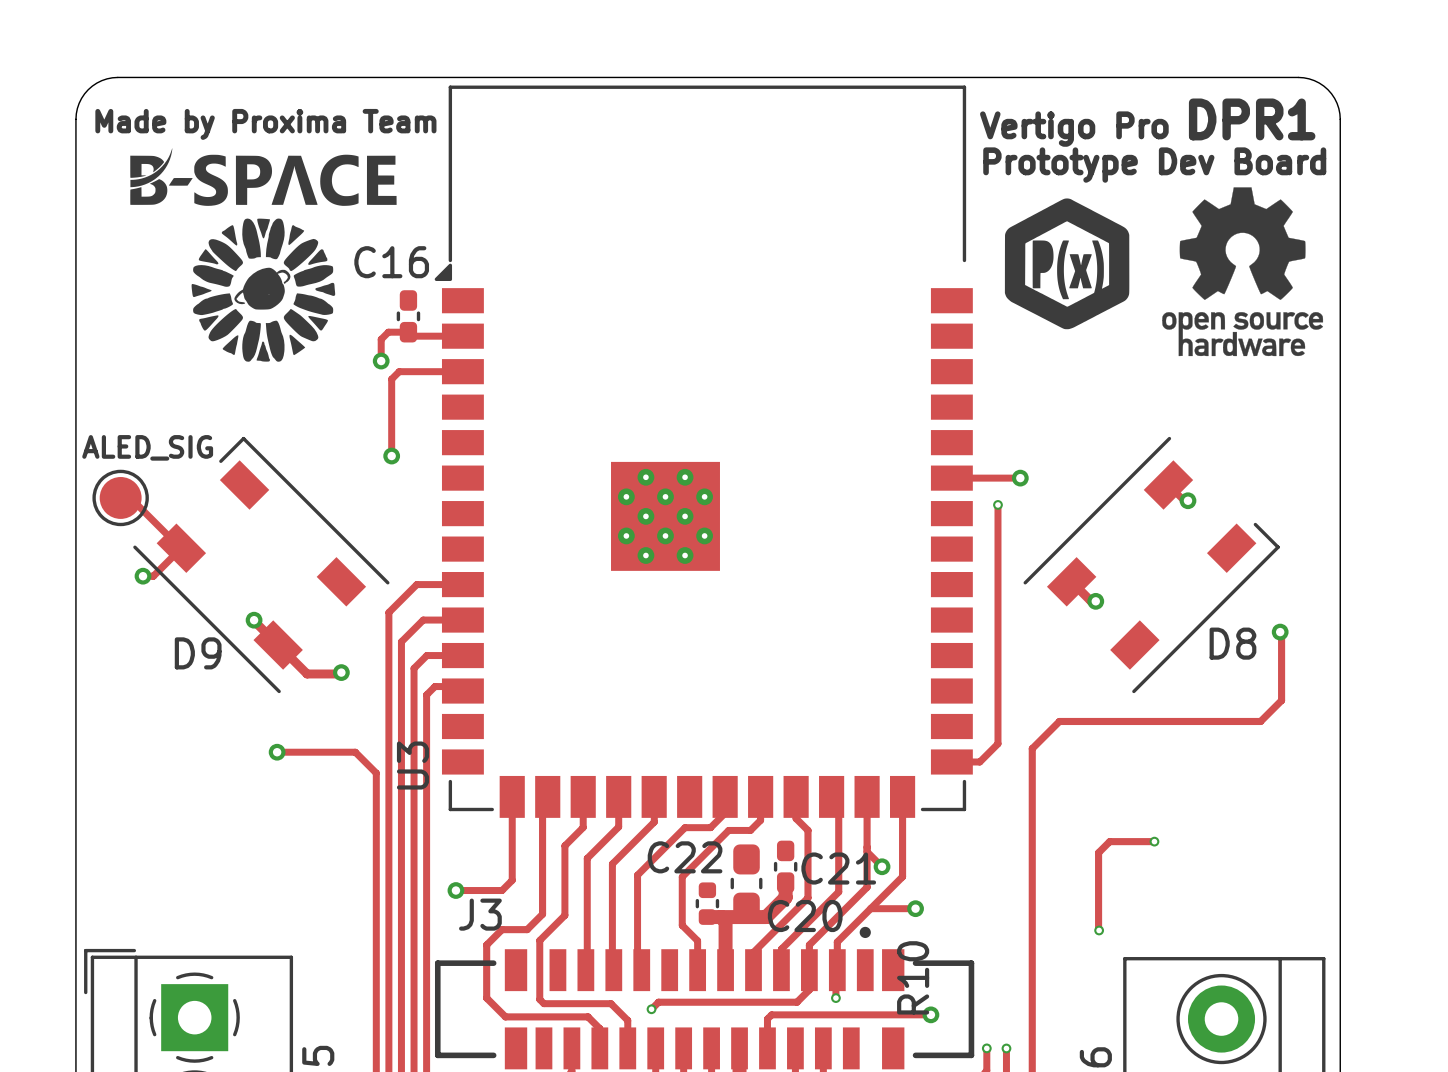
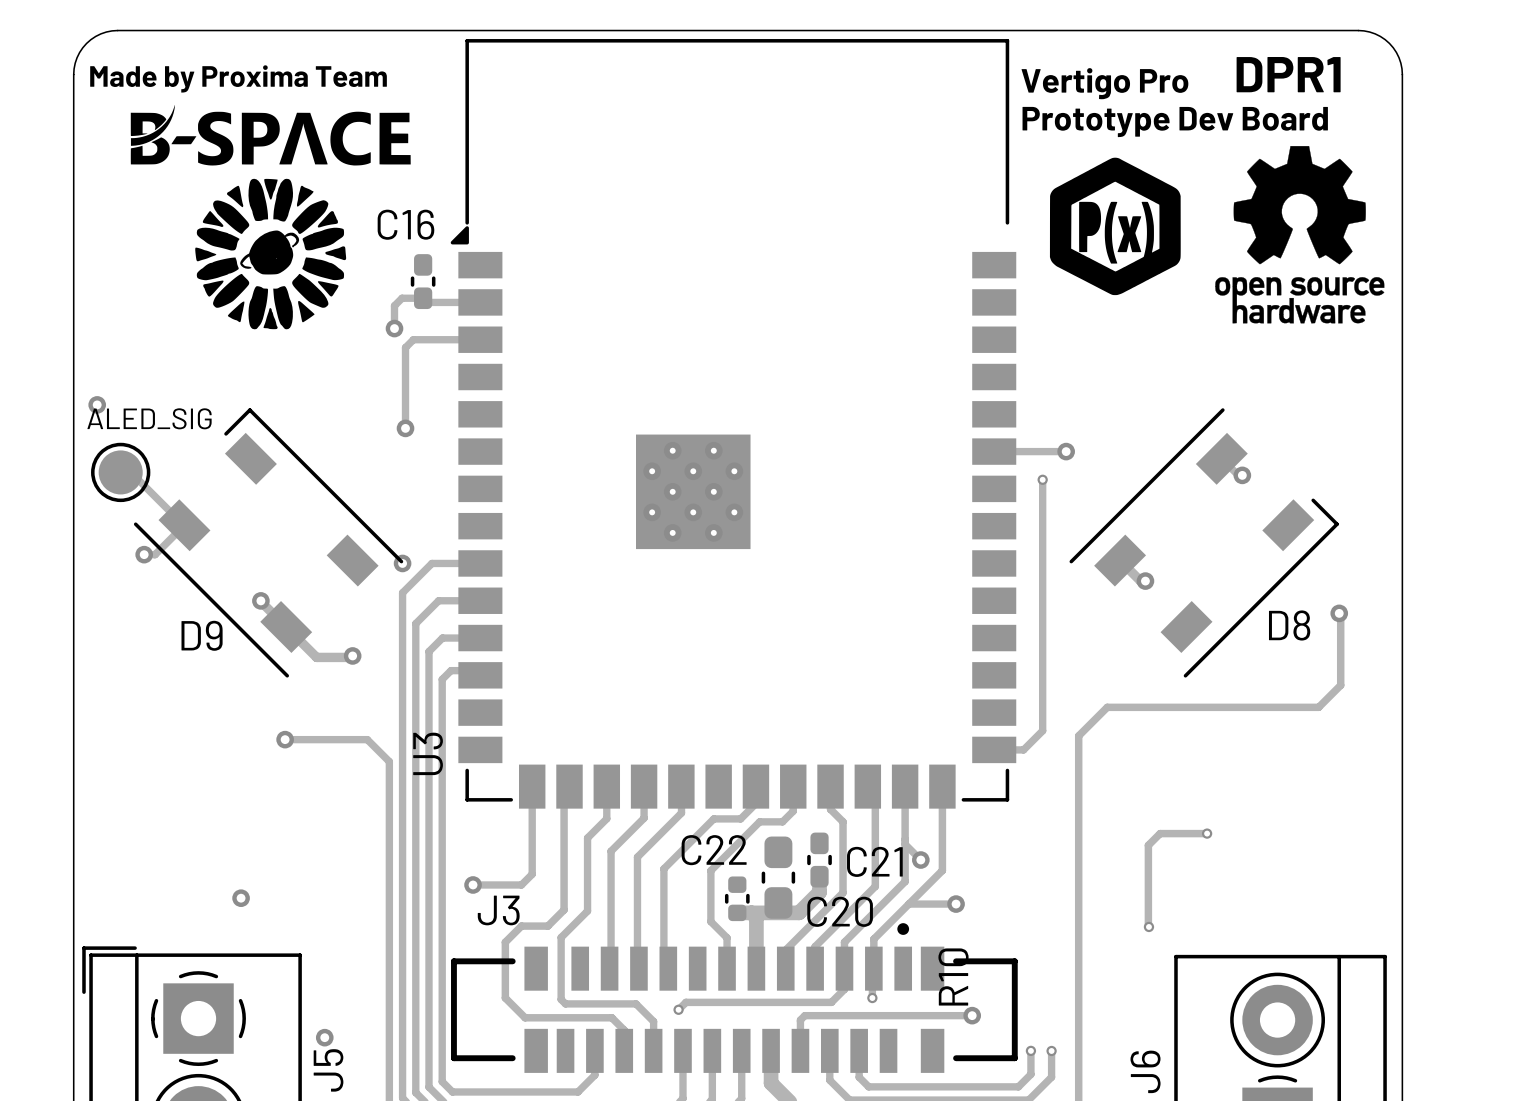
via: none -> (97, 404)
via: none -> (402, 563)
via: none -> (241, 898)
via: none -> (324, 1037)

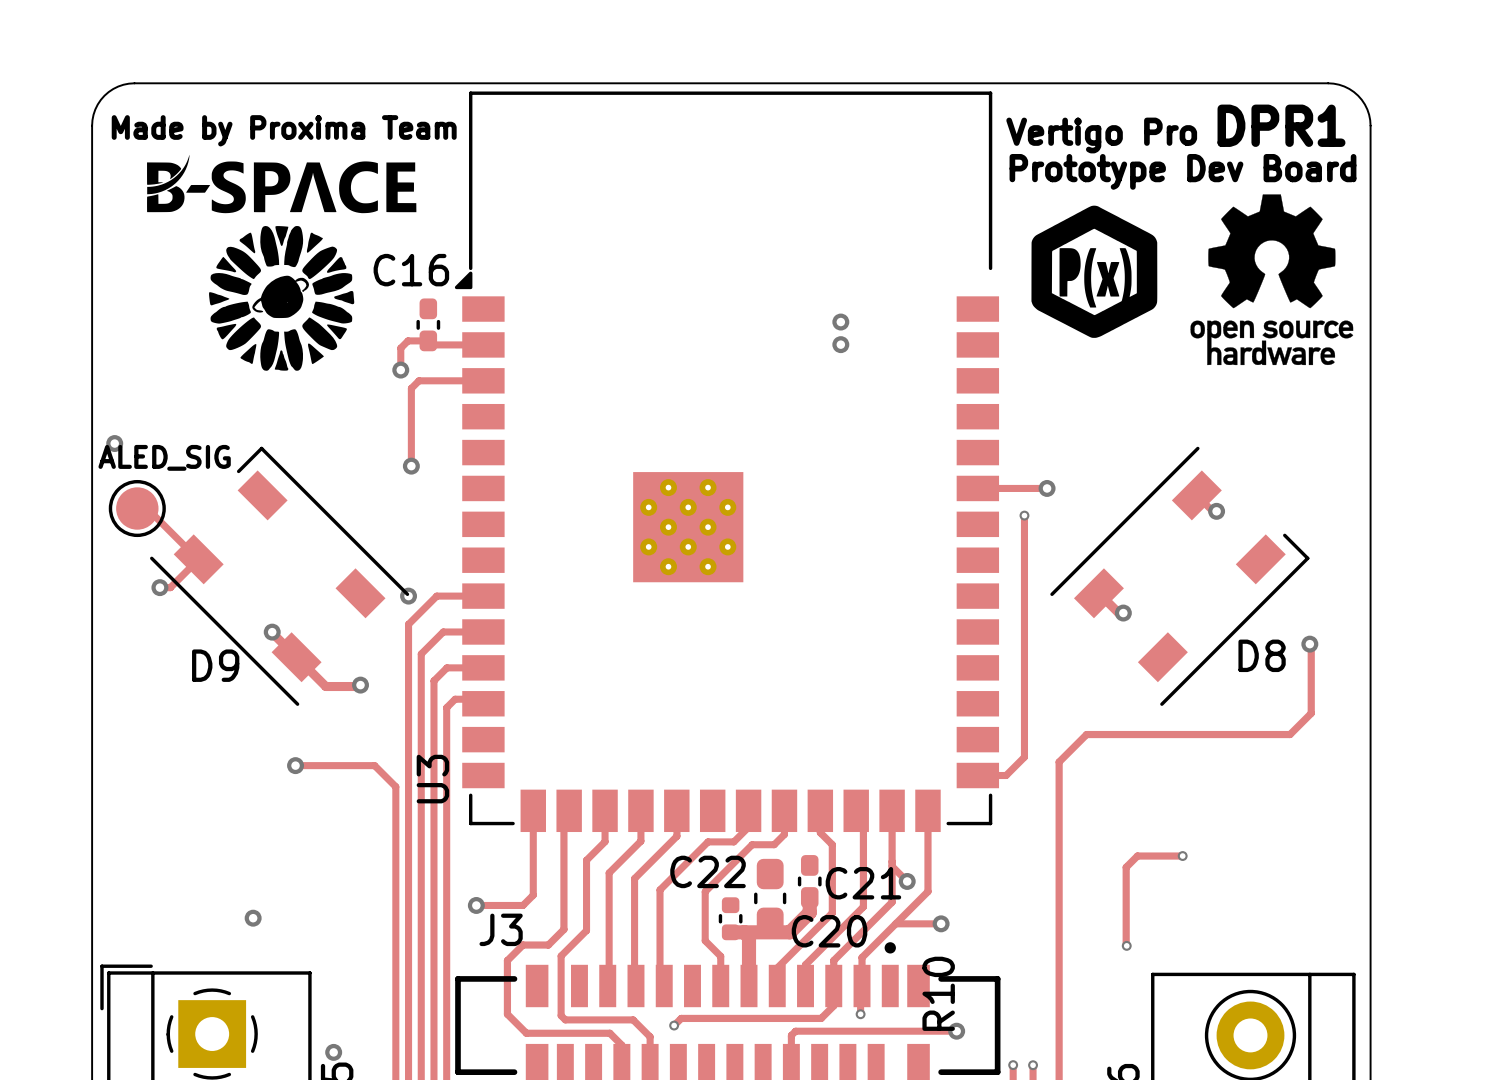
via: none -> (840, 322)
via: none -> (840, 344)

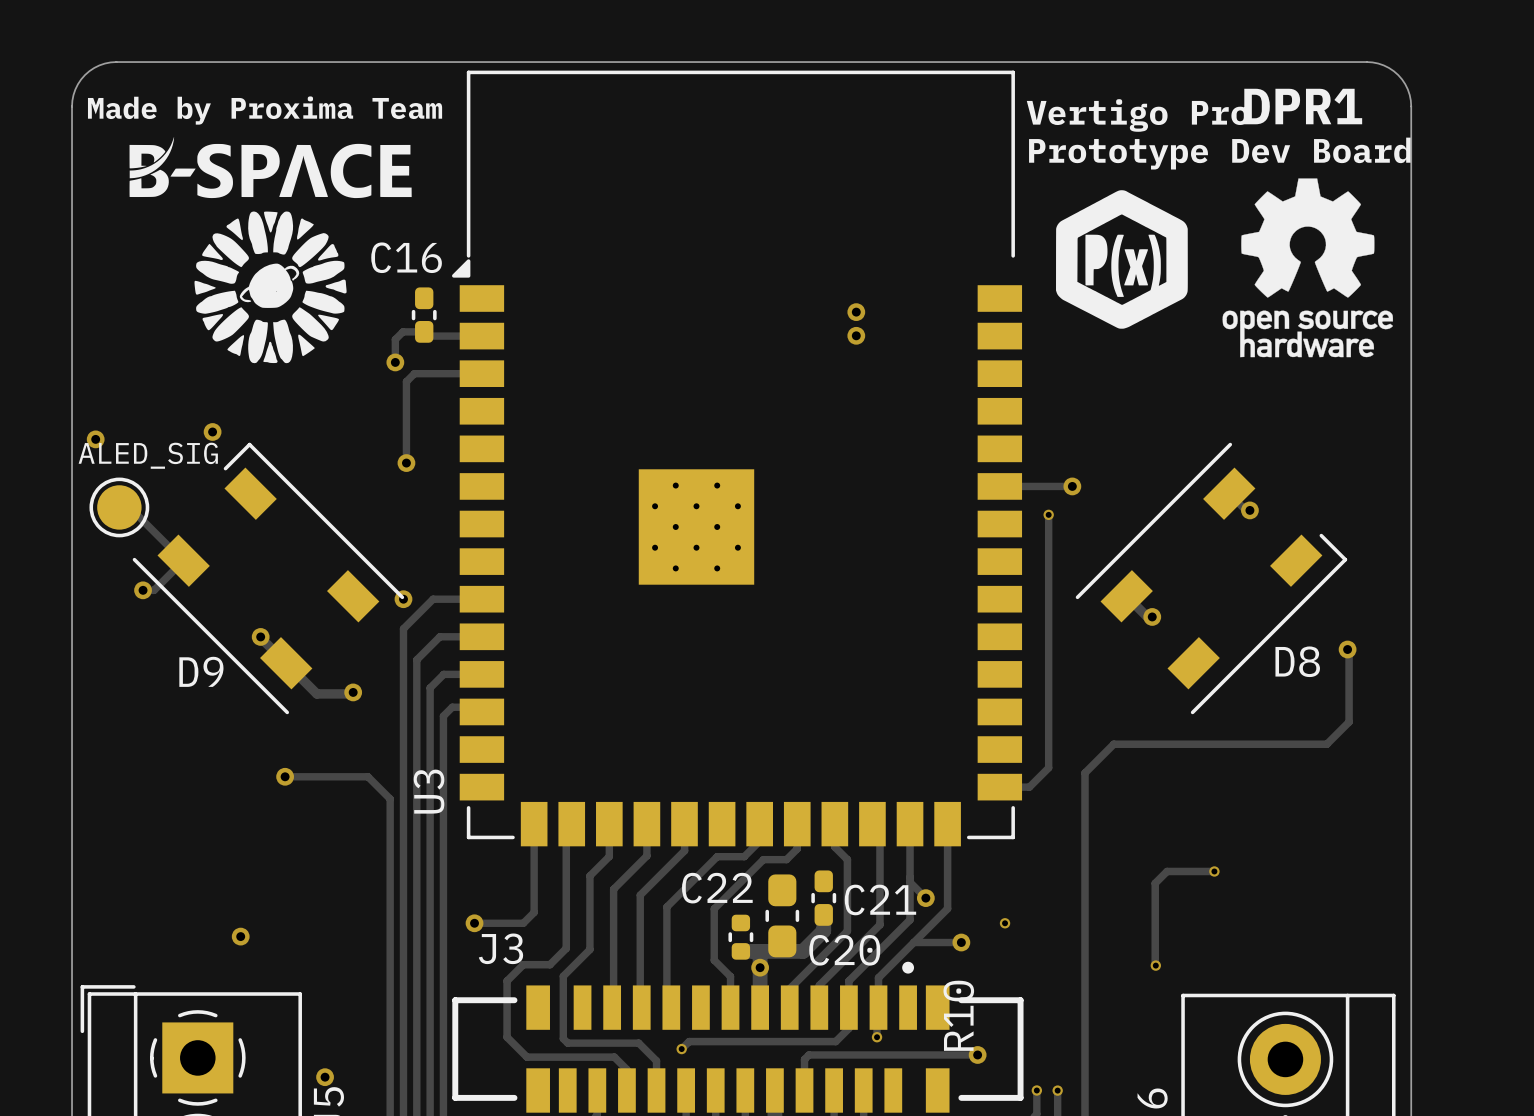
via: none -> (212, 431)
via: none -> (1005, 923)
via: none -> (760, 967)

